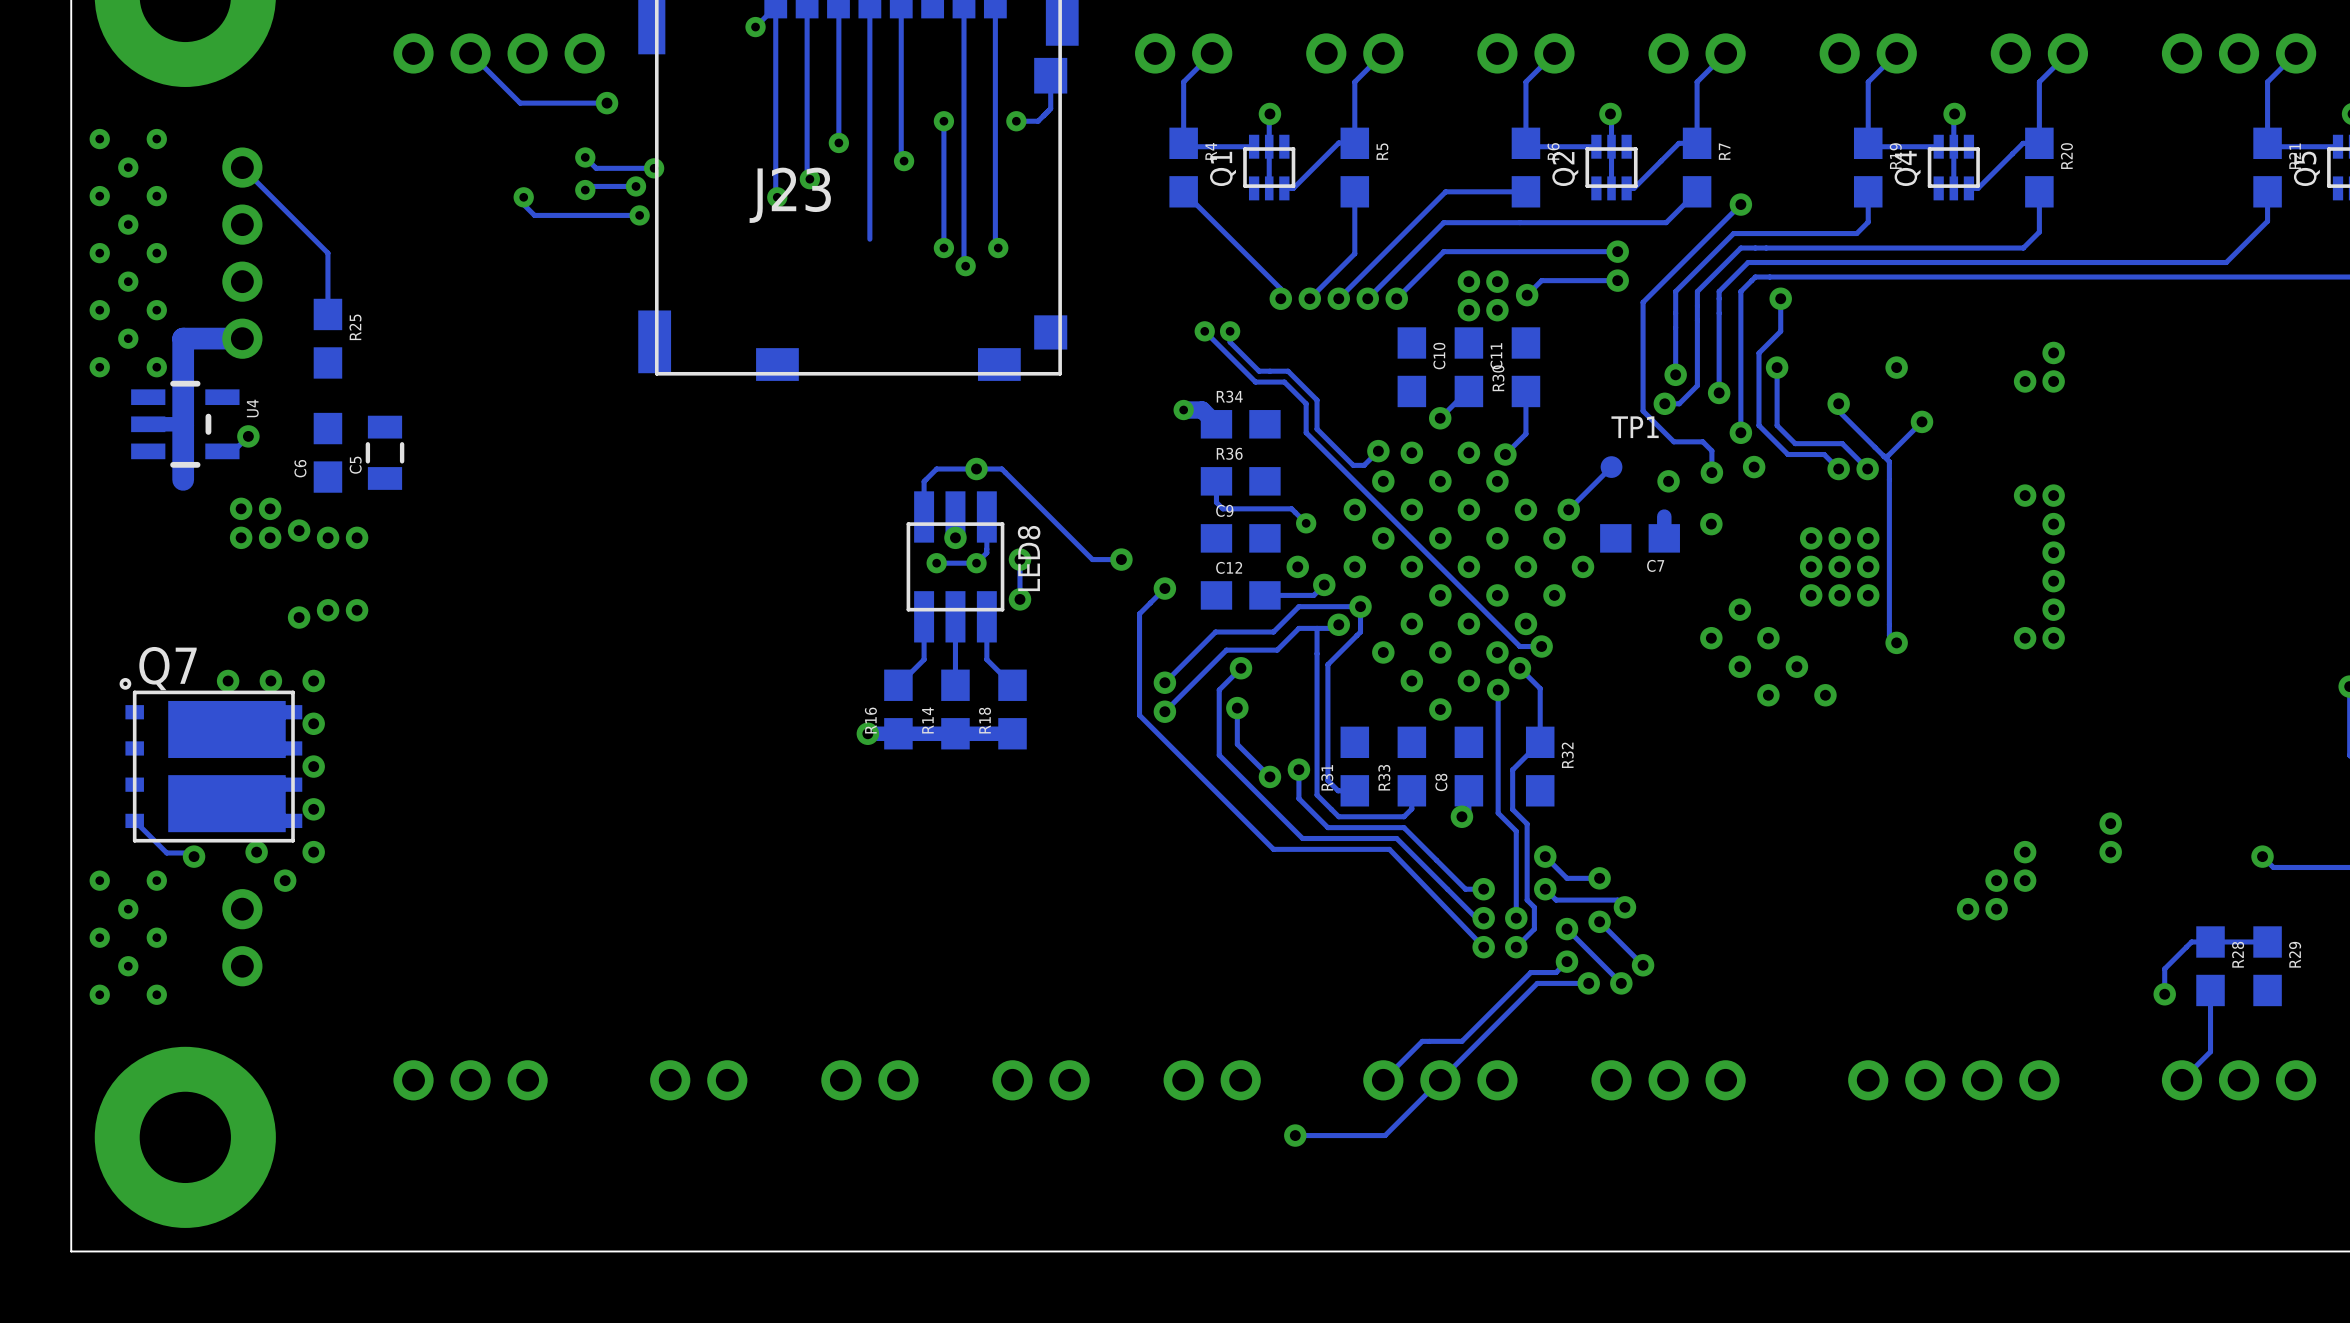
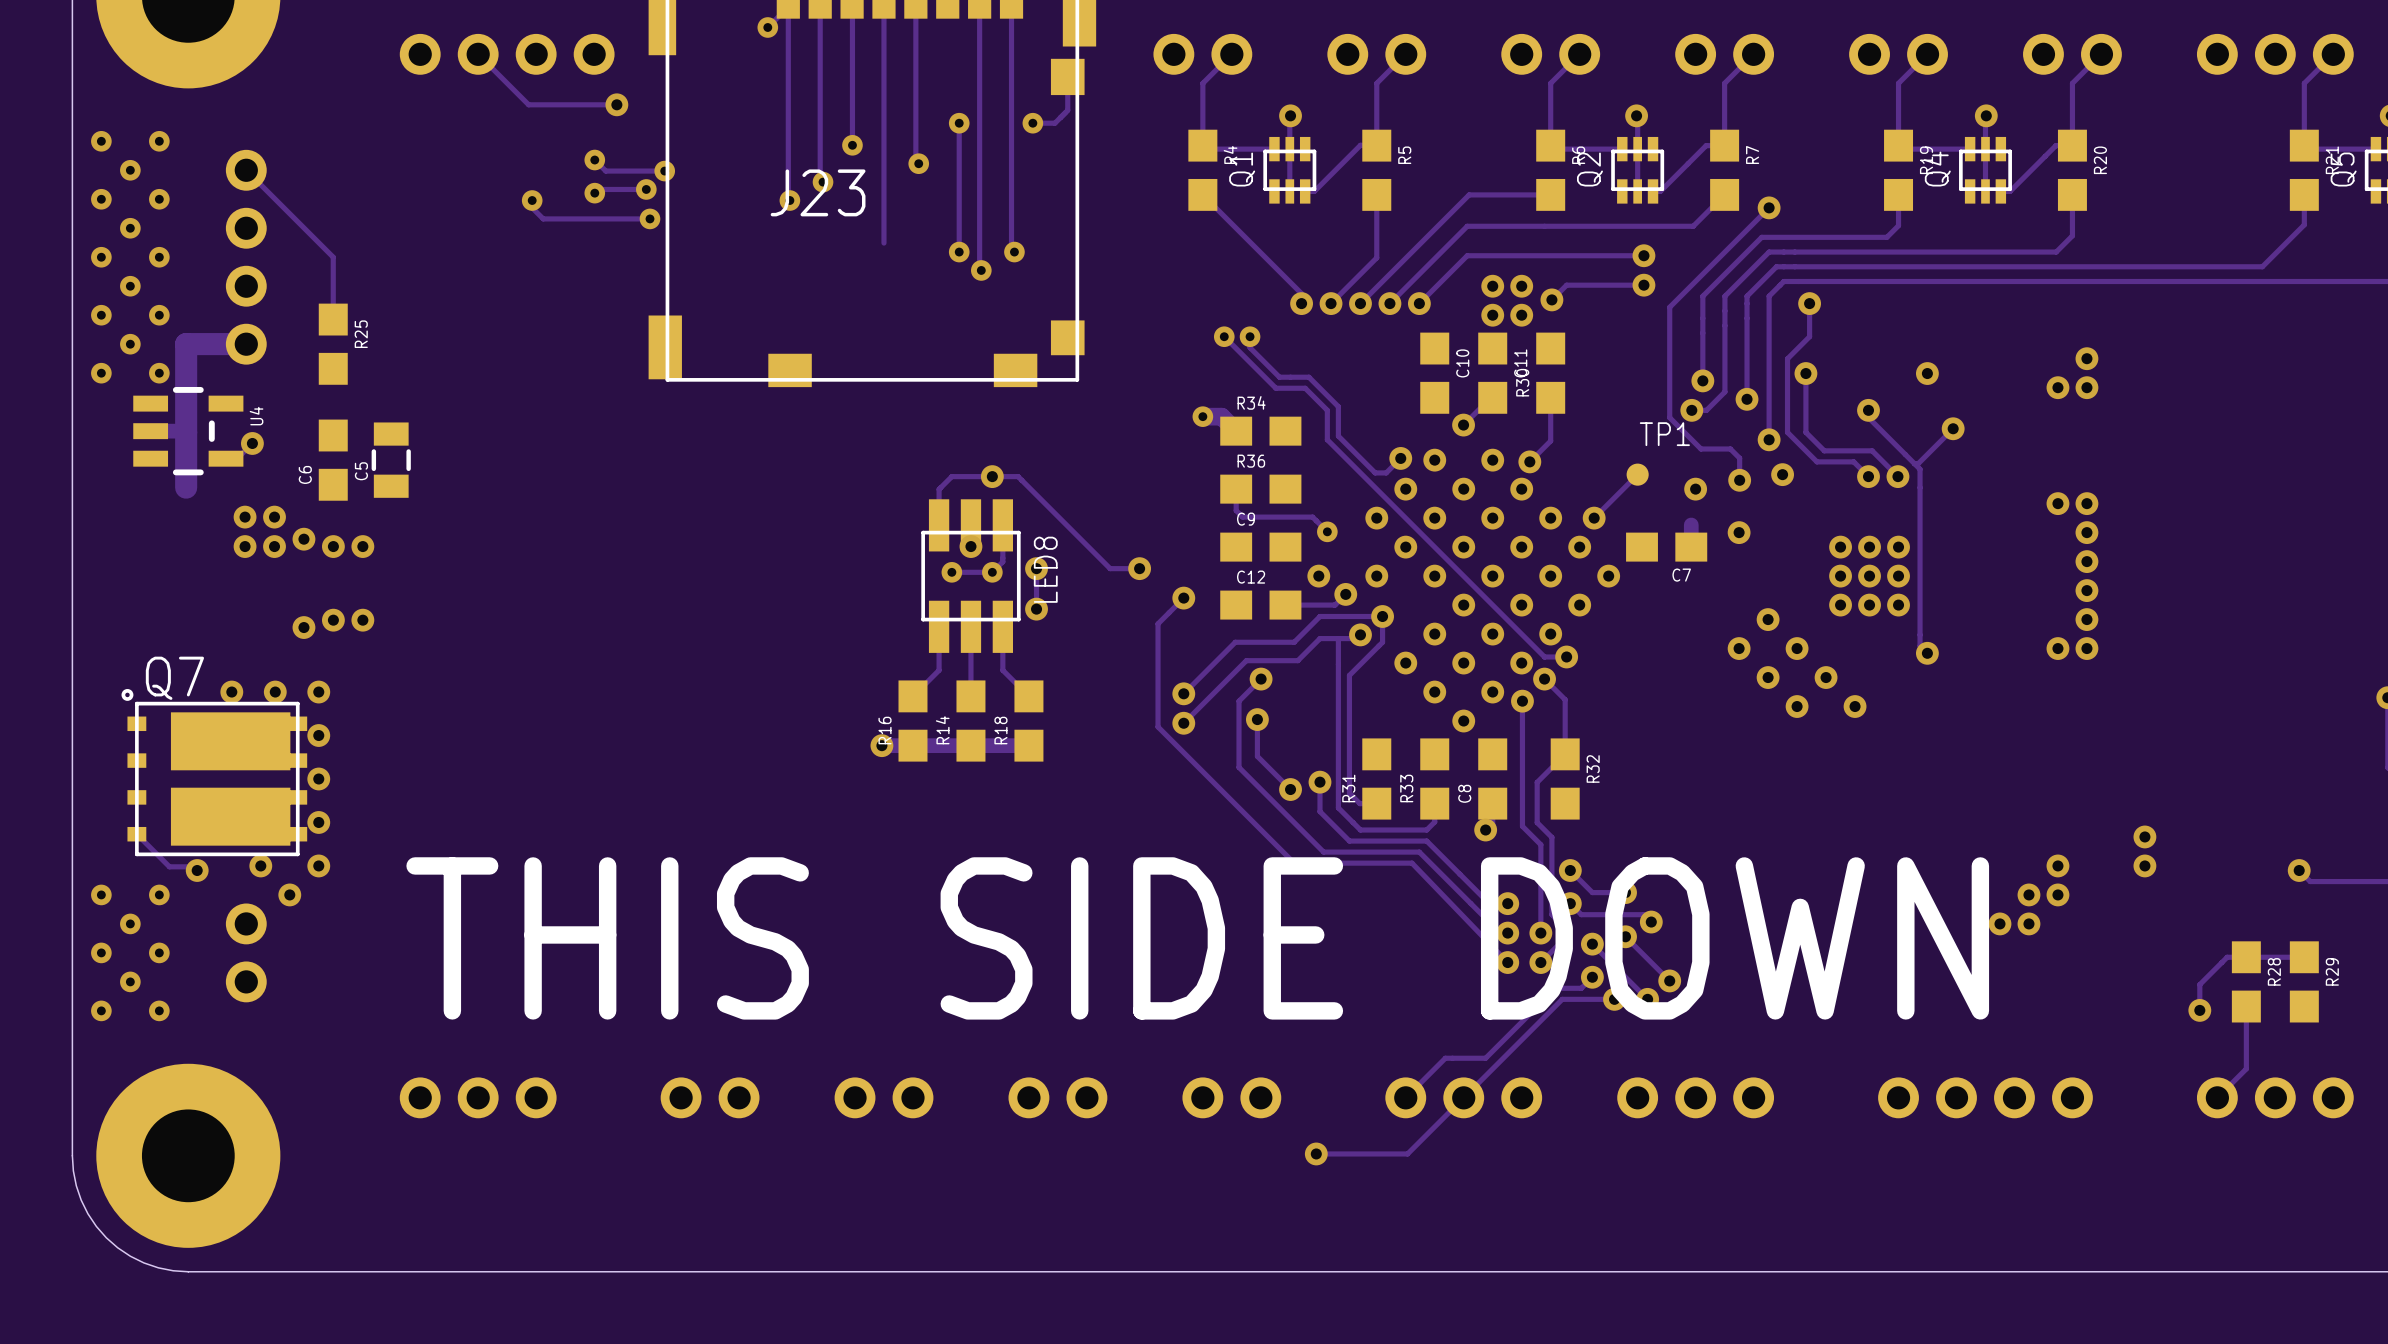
text: none -> THIS SIDE DOWN (1197, 938)
board edge: (71, 1137) (71, 1251) (185, 1251) -> (72, 1155) (73, 1170) (81, 1200) (87, 1213) (106, 1237) (130, 1256) (143, 1262) (173, 1270) (188, 1271)

